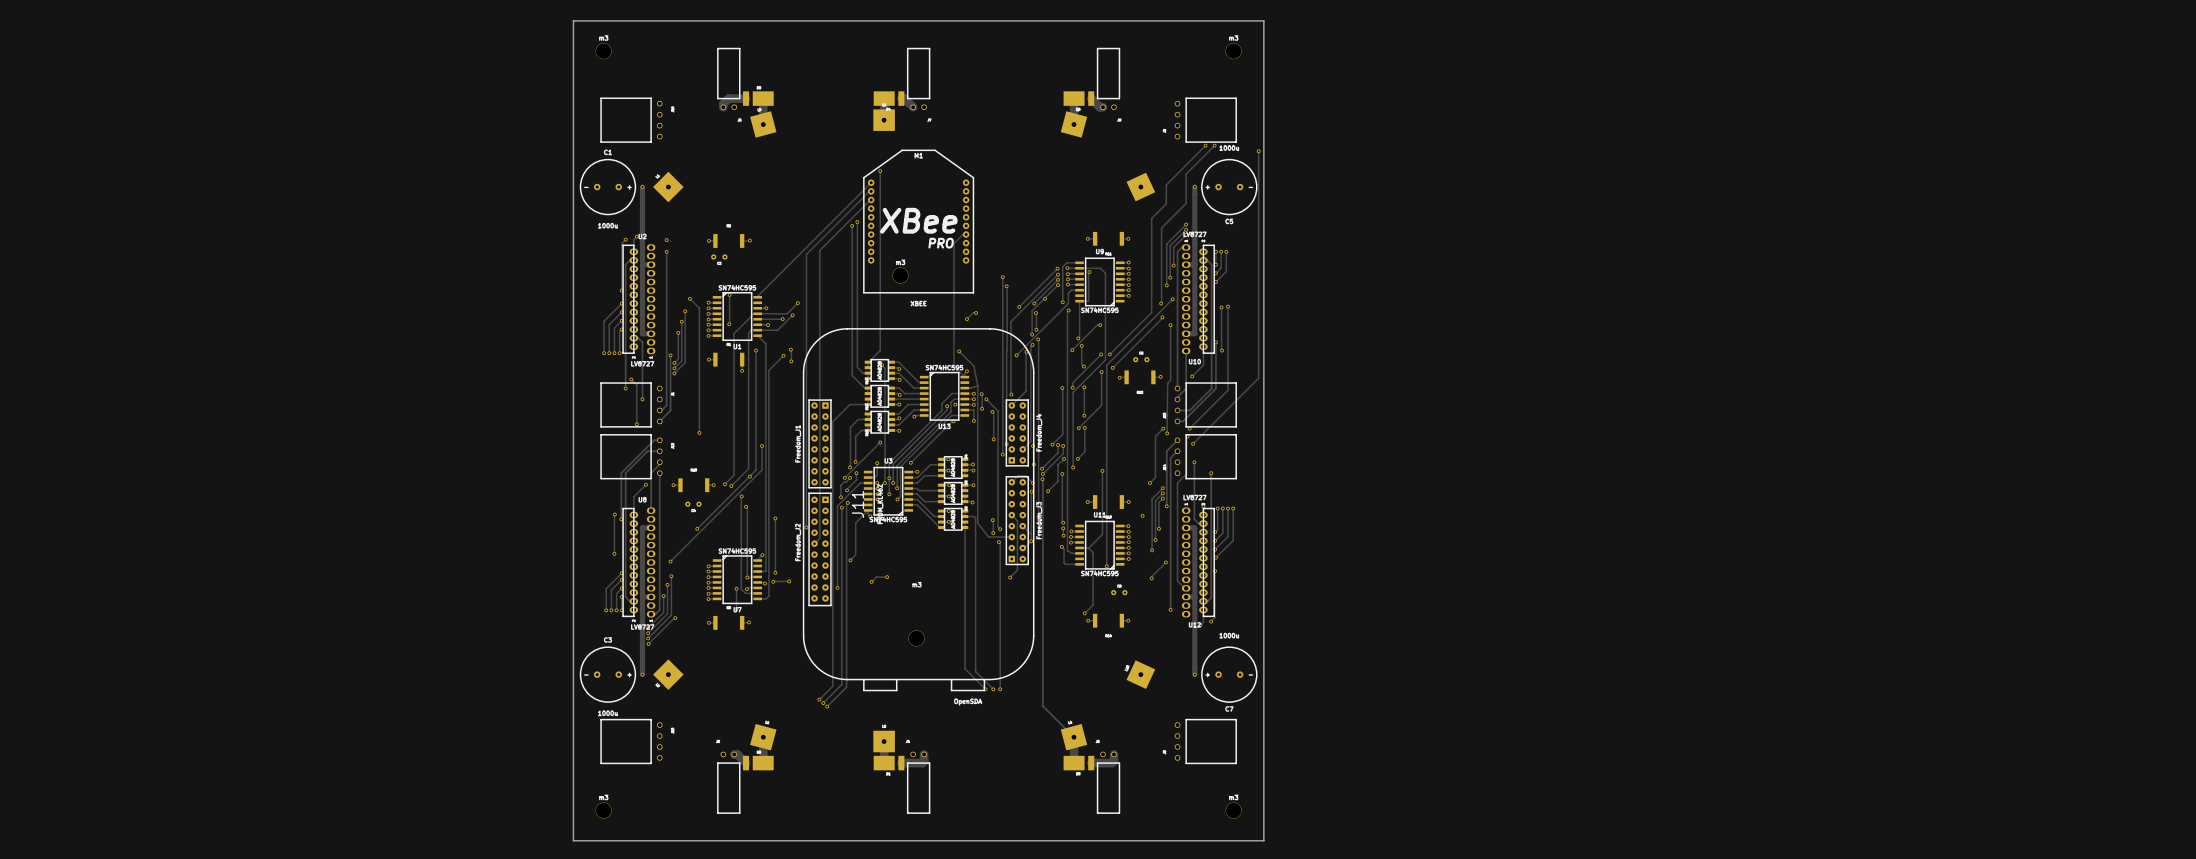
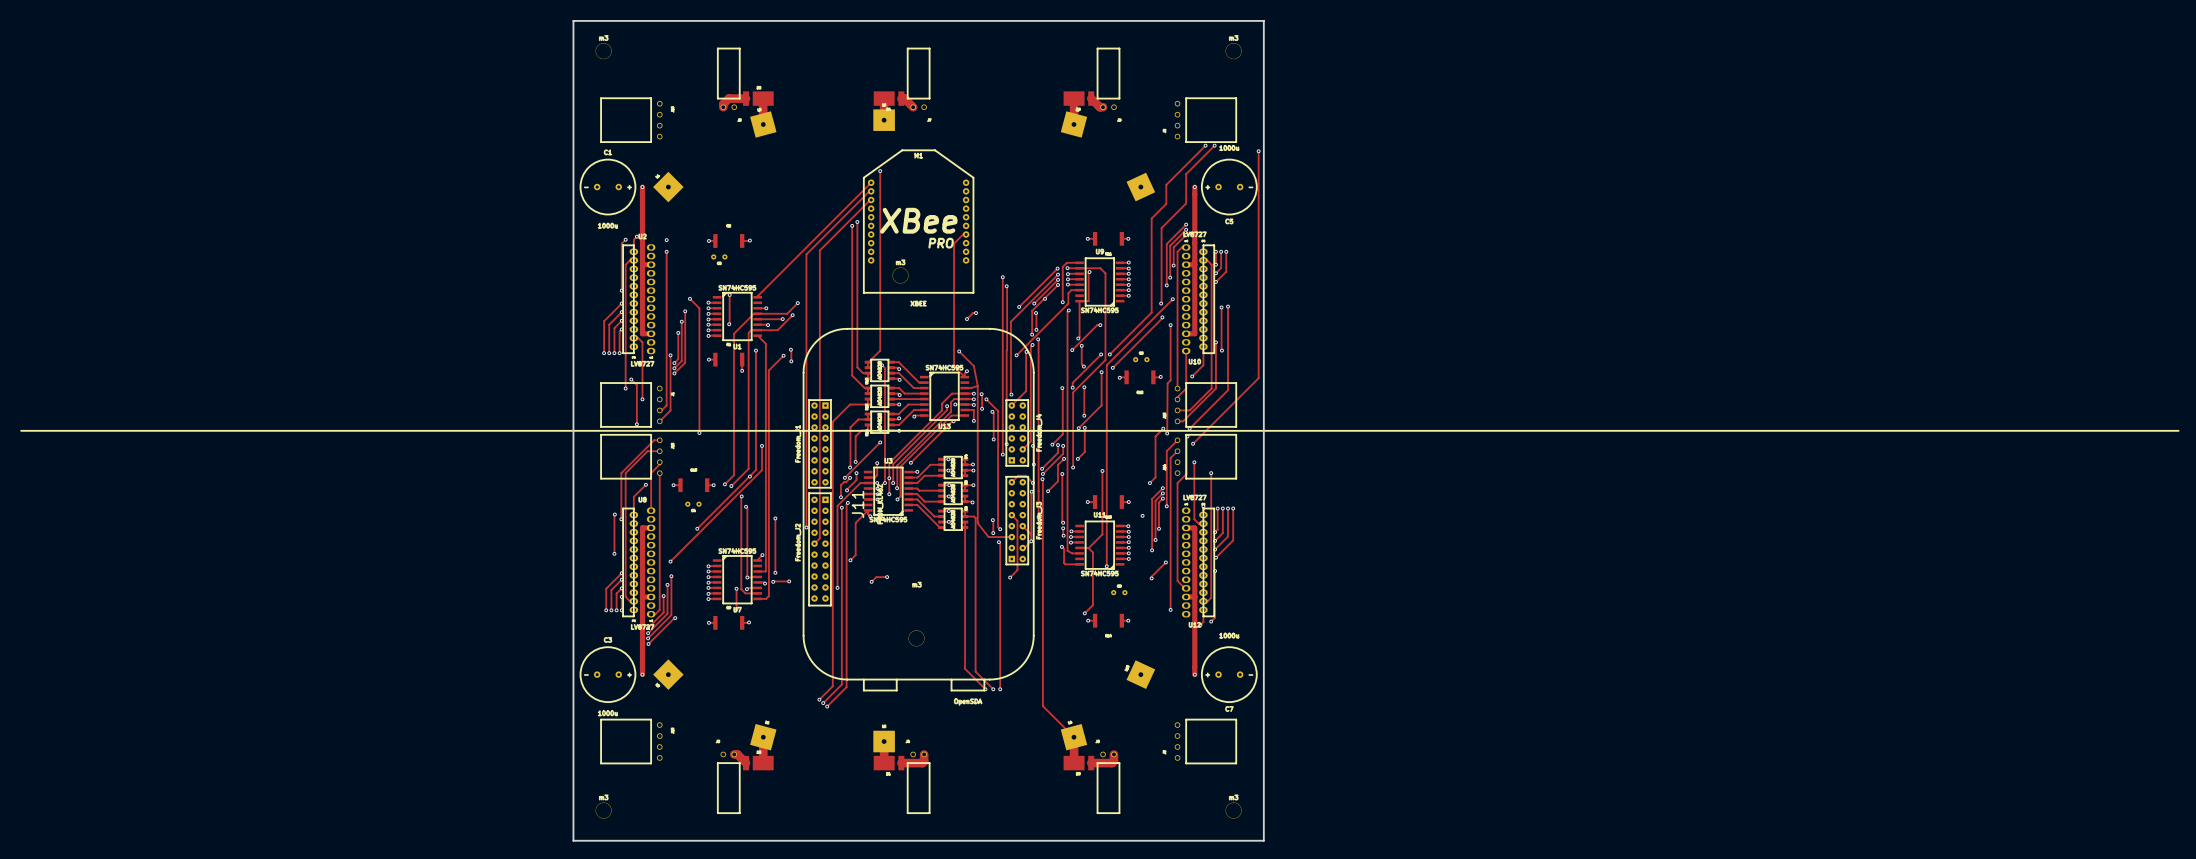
line: none -> (21, 430) (2178, 430)

